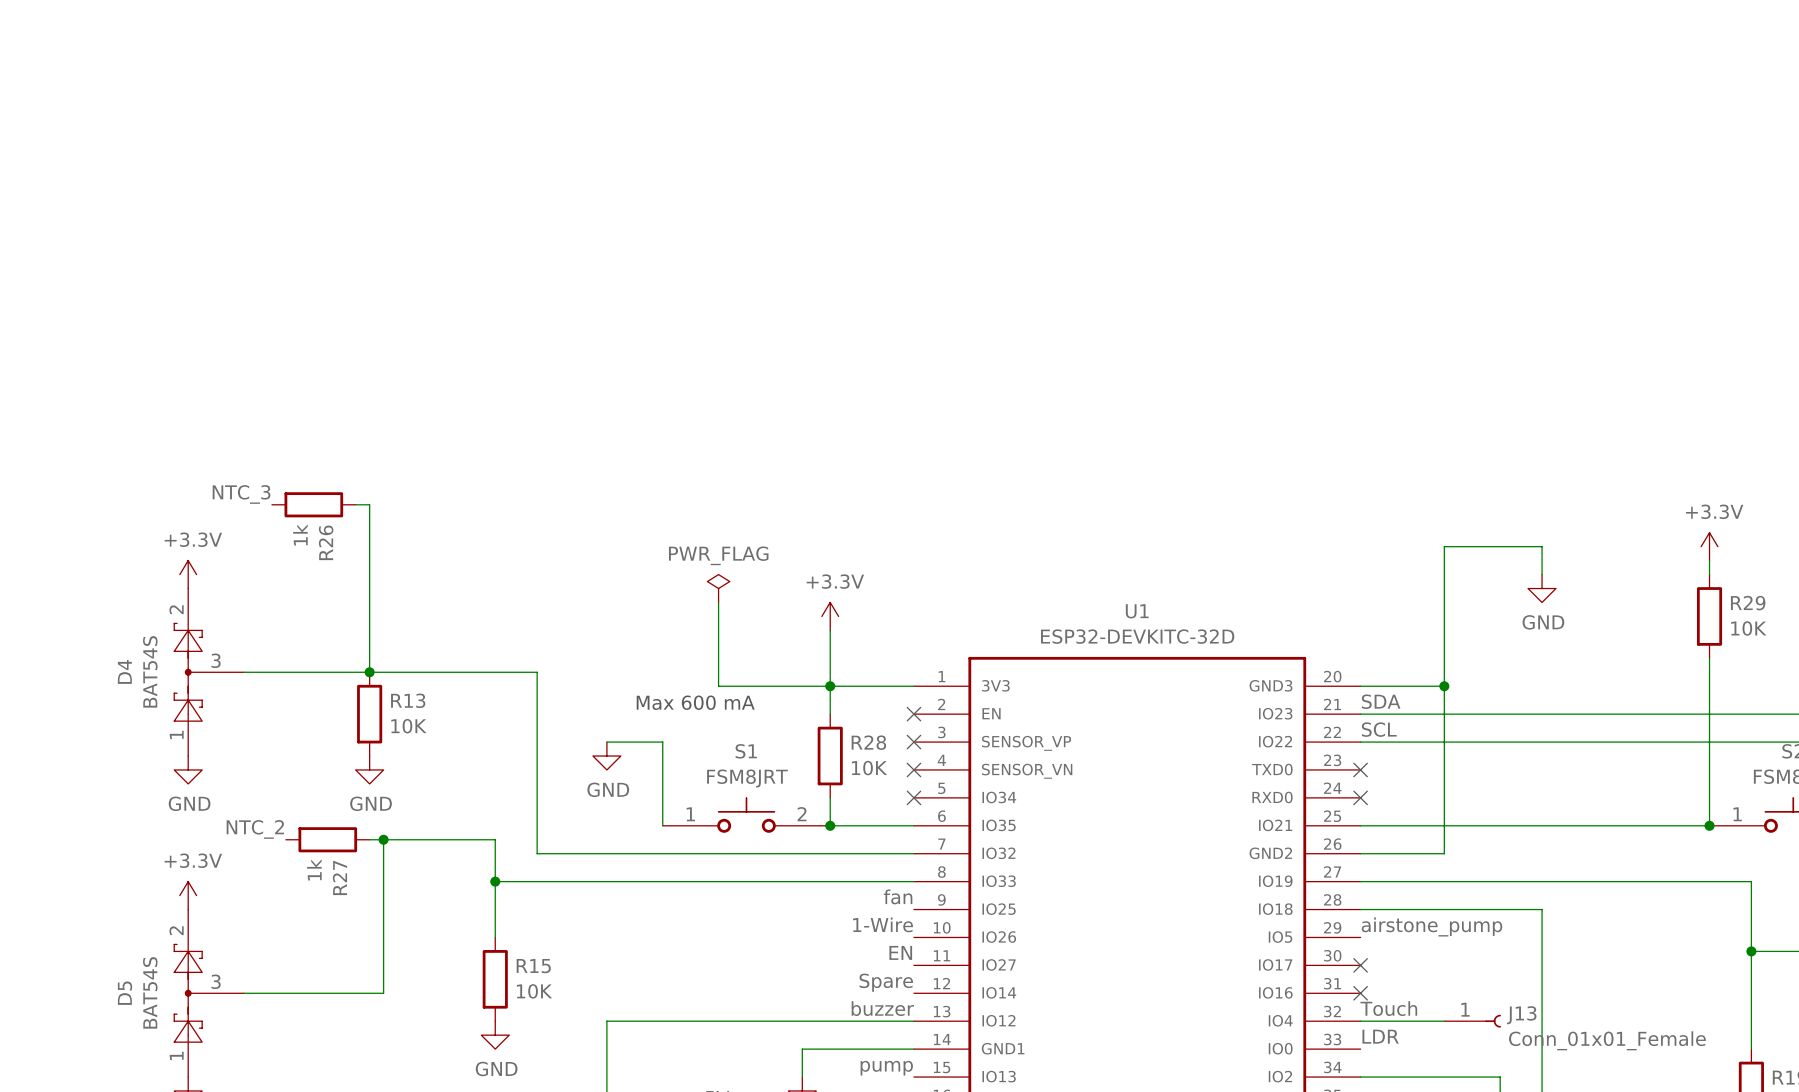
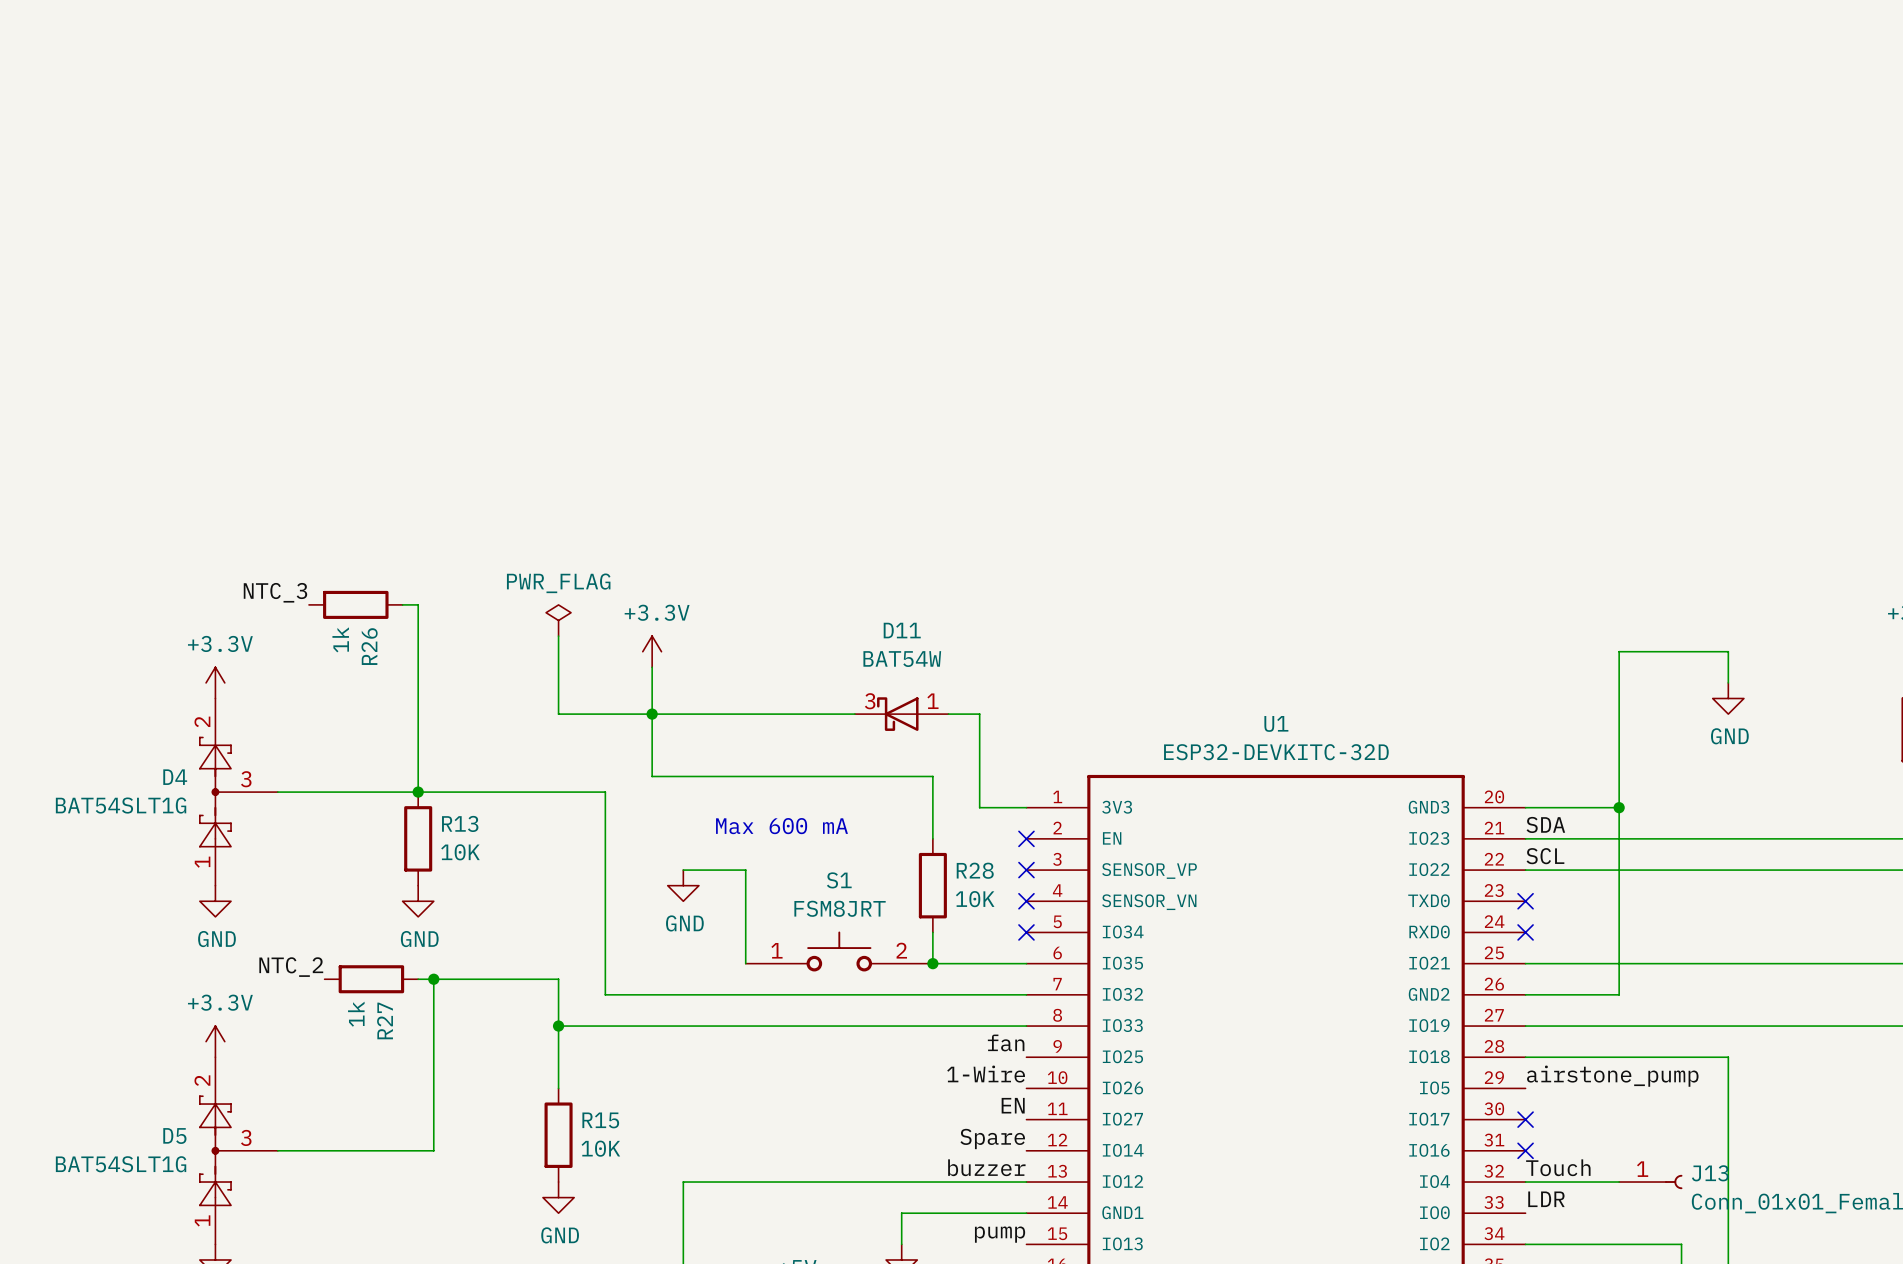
wire: none -> (558, 636) (558, 714) (854, 714)
power symbol position: PWR_FLAG (718, 588) -> PWR_FLAG (558, 620)
junction: none -> (652, 714)
wire: (718, 602) (718, 686) (872, 686) -> (948, 714) (979, 714) (979, 807)
D11: none -> BAT54W (901, 714)
power symbol position: +3.3V (830, 616) -> +3.3V (652, 651)
wire: (830, 630) (830, 658) -> (652, 667) (652, 776) (932, 776)
D4 name rotation: 0° (124, 671) -> 90° clockwise (175, 777)
D4 value: BAT54S (150, 671) -> BAT54SLT1G (121, 805)
junction: (830, 686) -> none
D5 value: BAT54S (150, 992) -> BAT54SLT1G (121, 1164)
D5 name rotation: 0° (125, 993) -> 90° clockwise (174, 1136)

